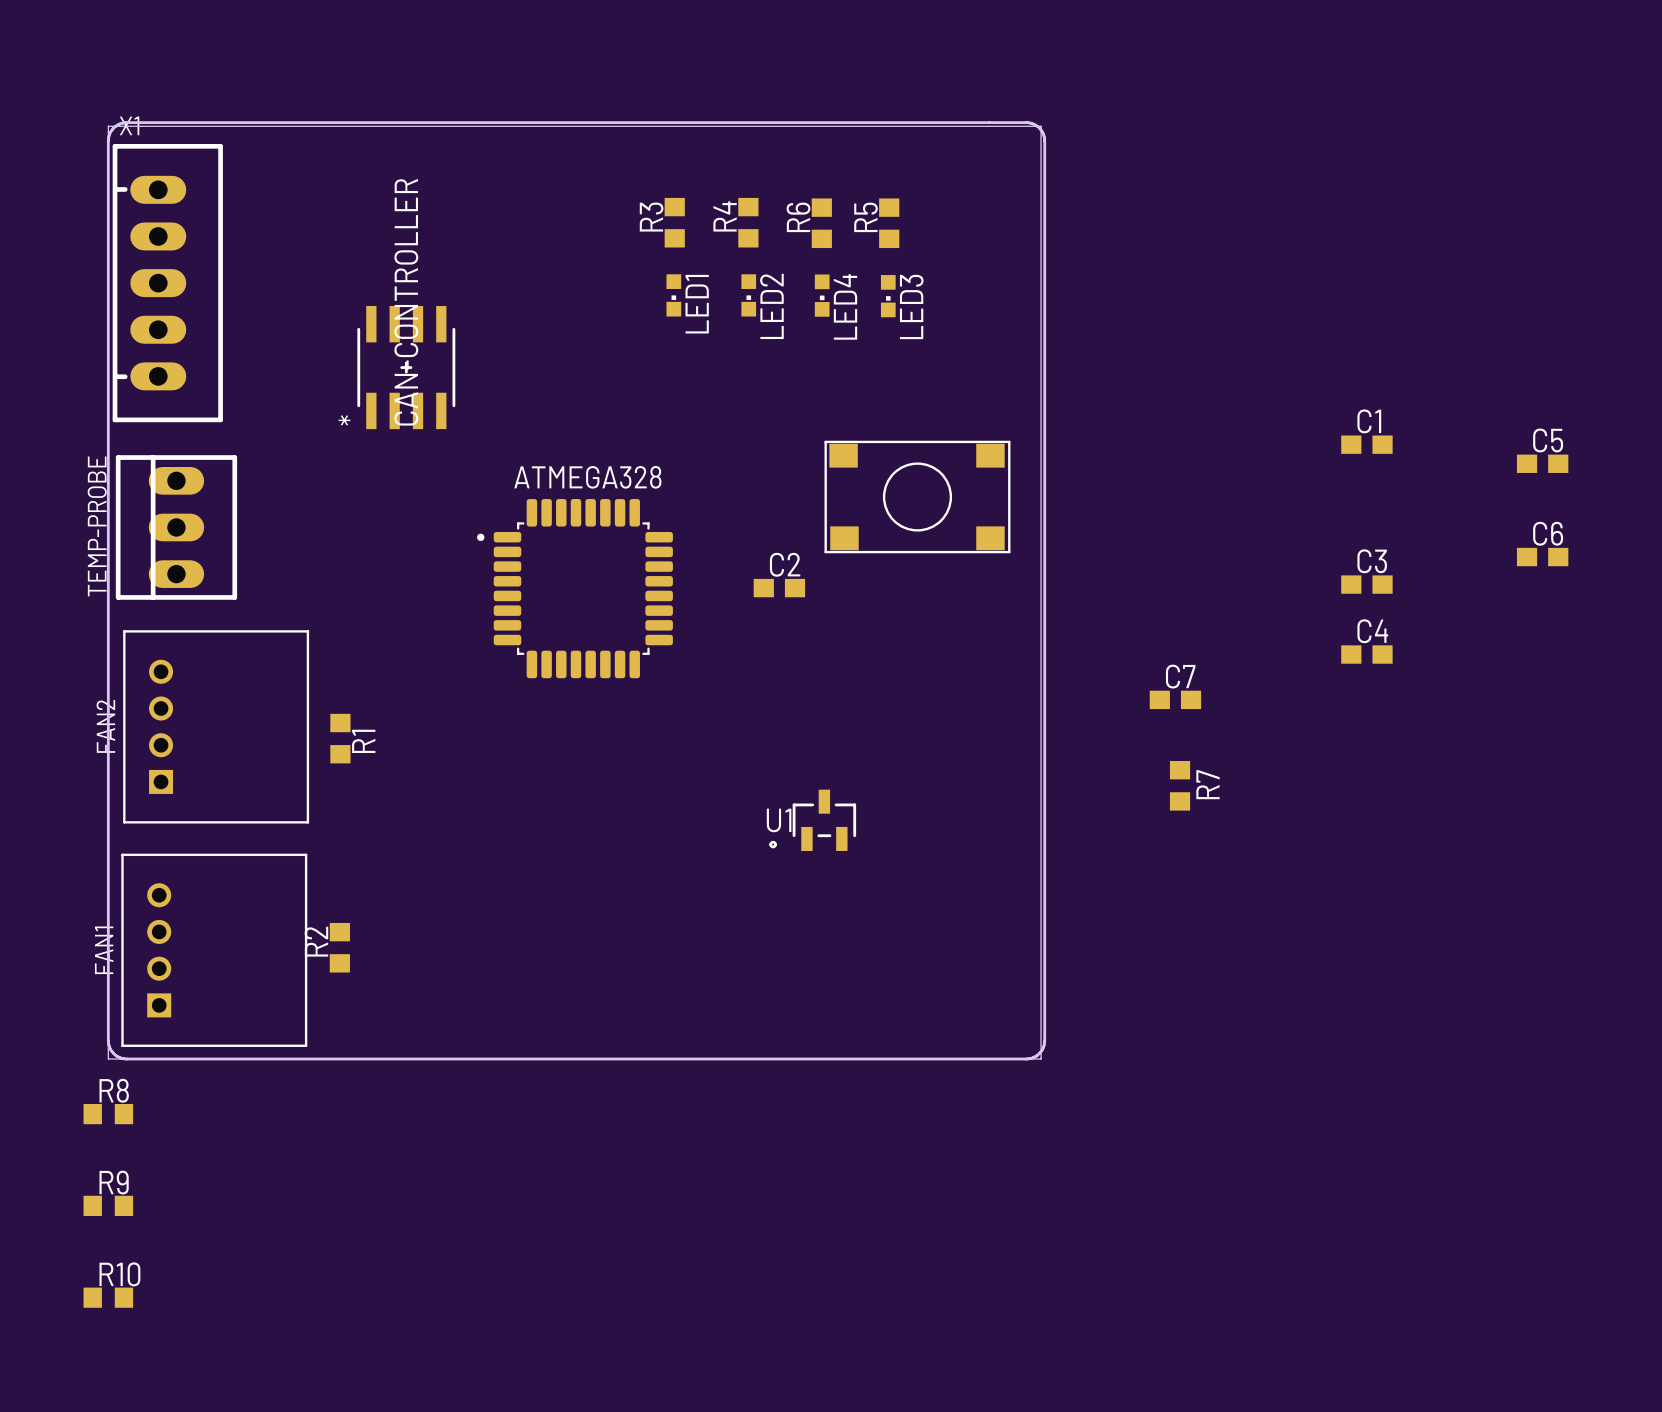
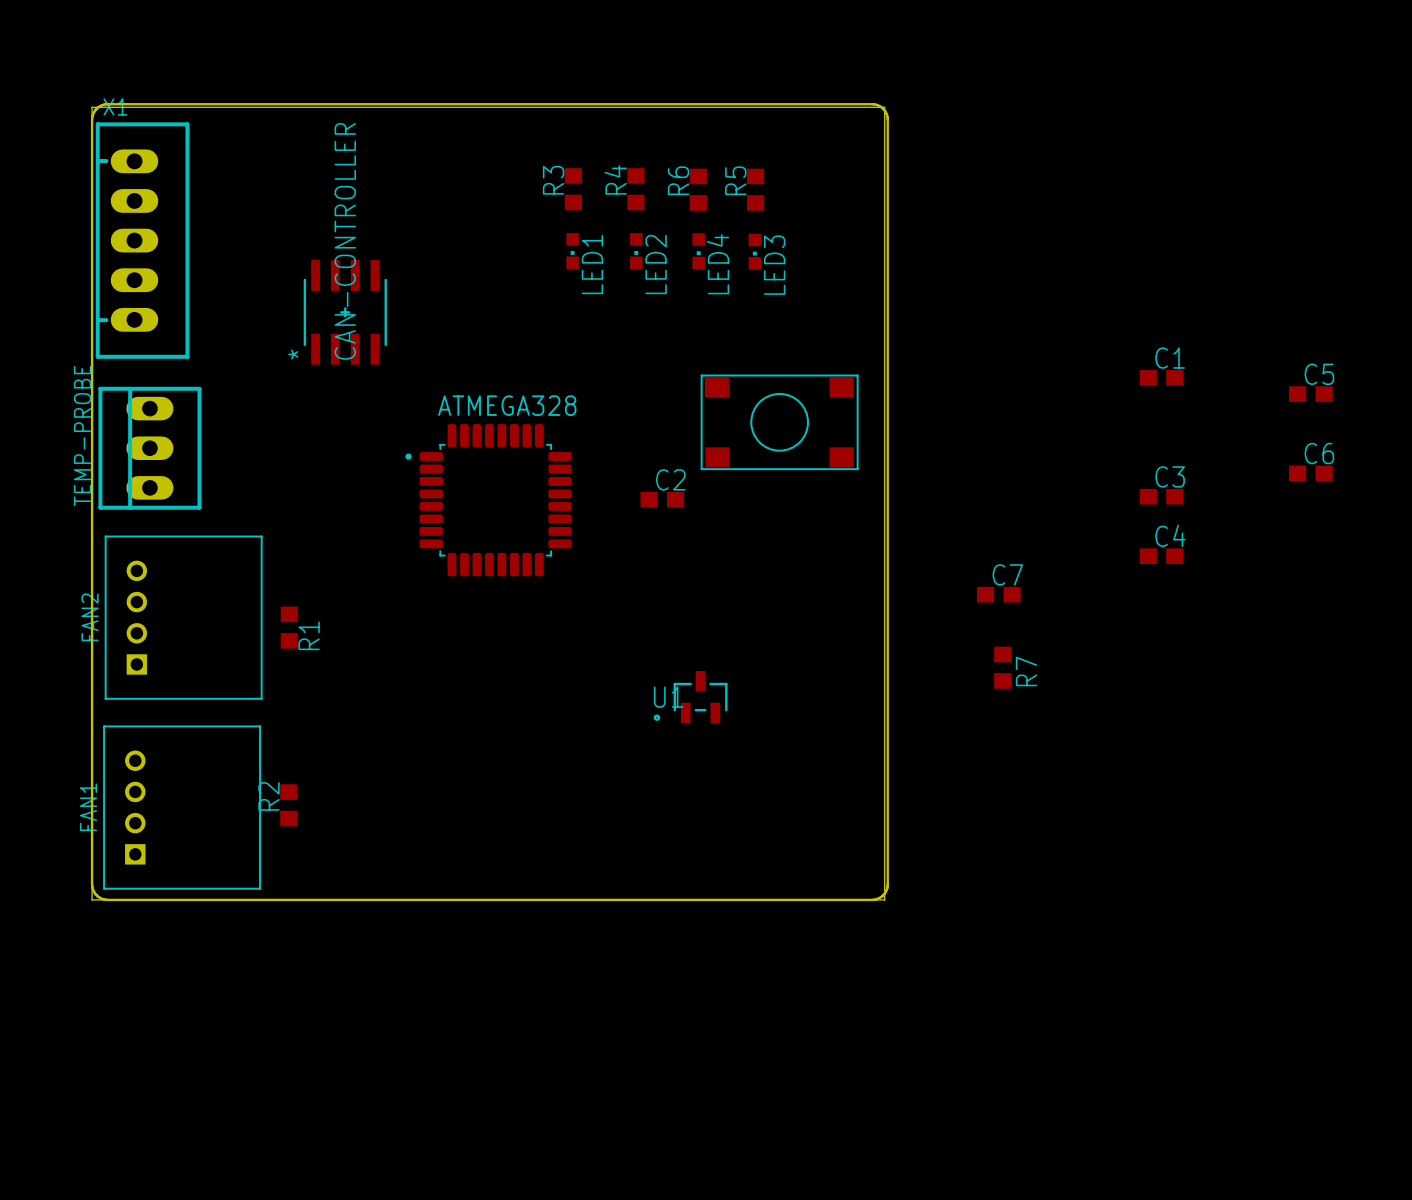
R8: (108, 1114) -> none
R9: (108, 1205) -> none
R10: (108, 1297) -> none

